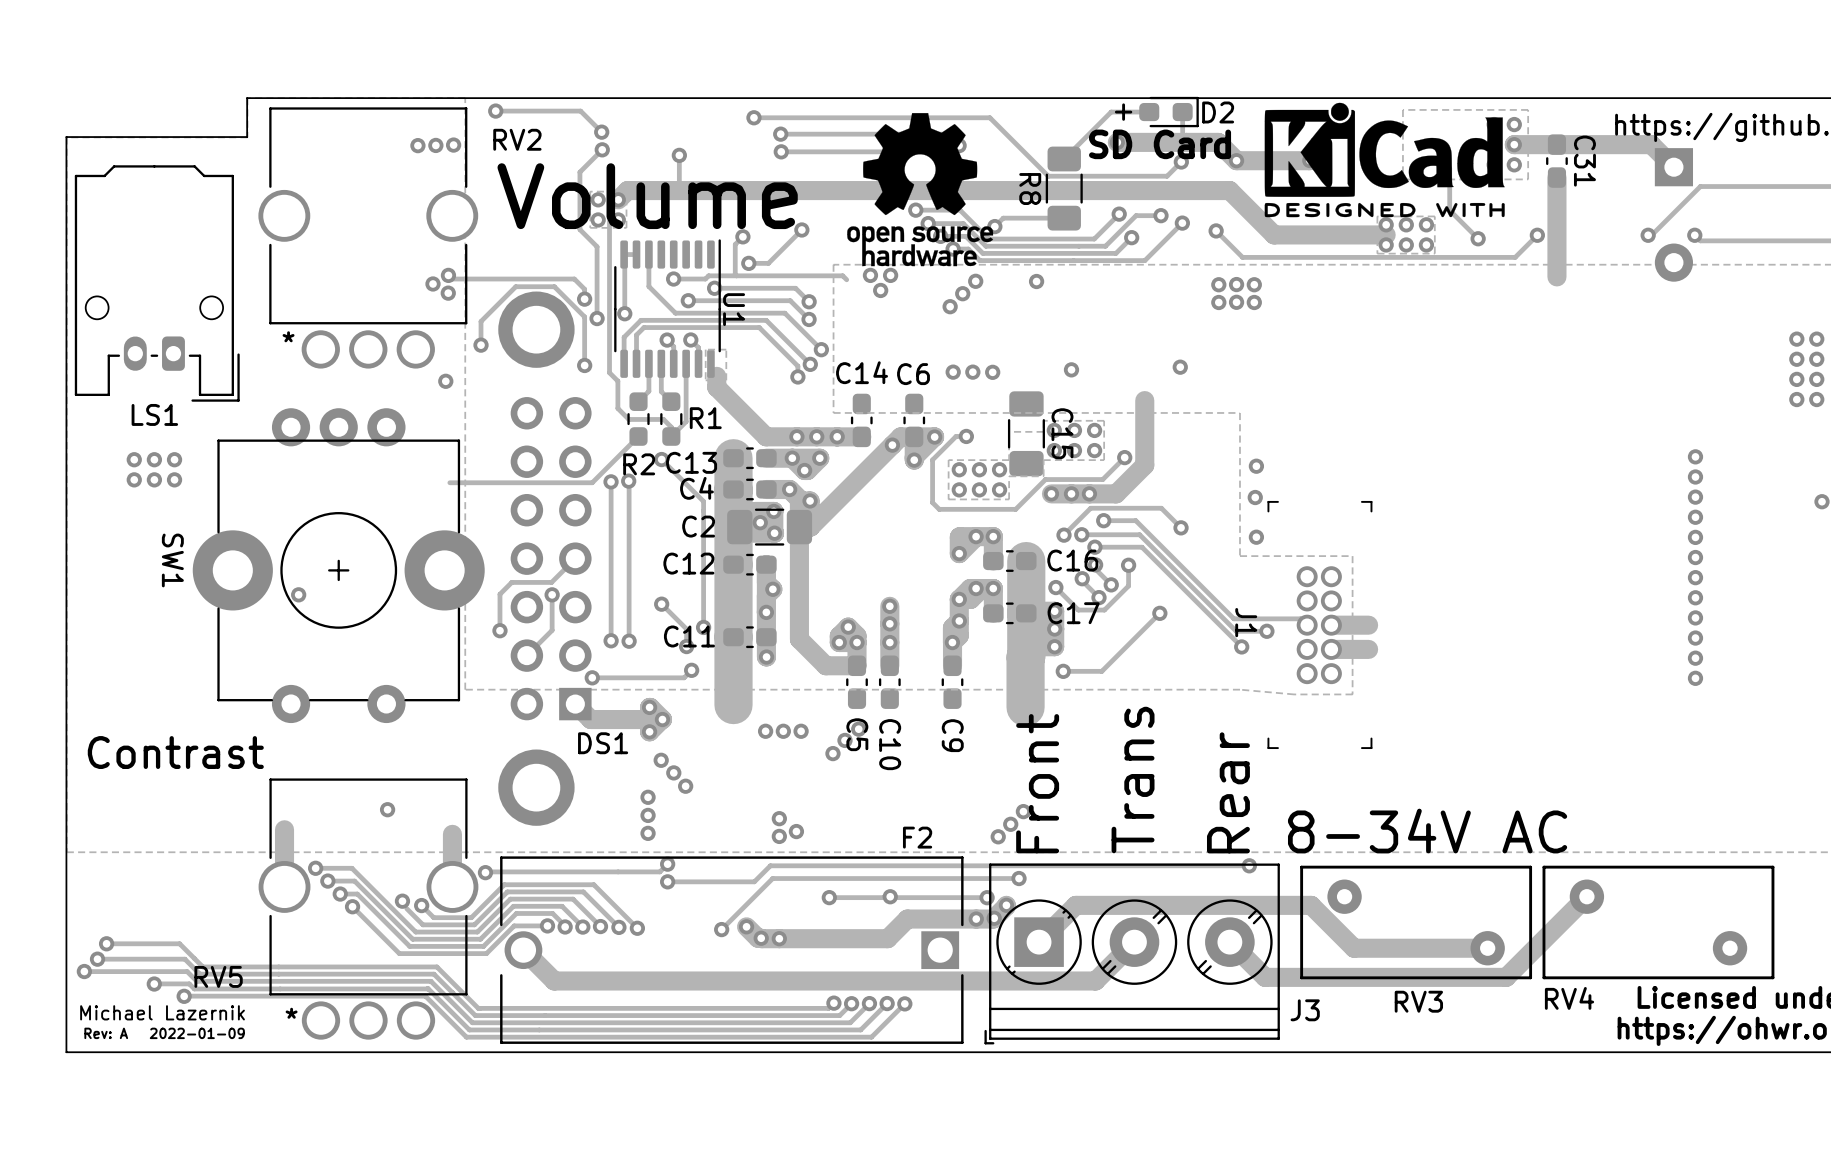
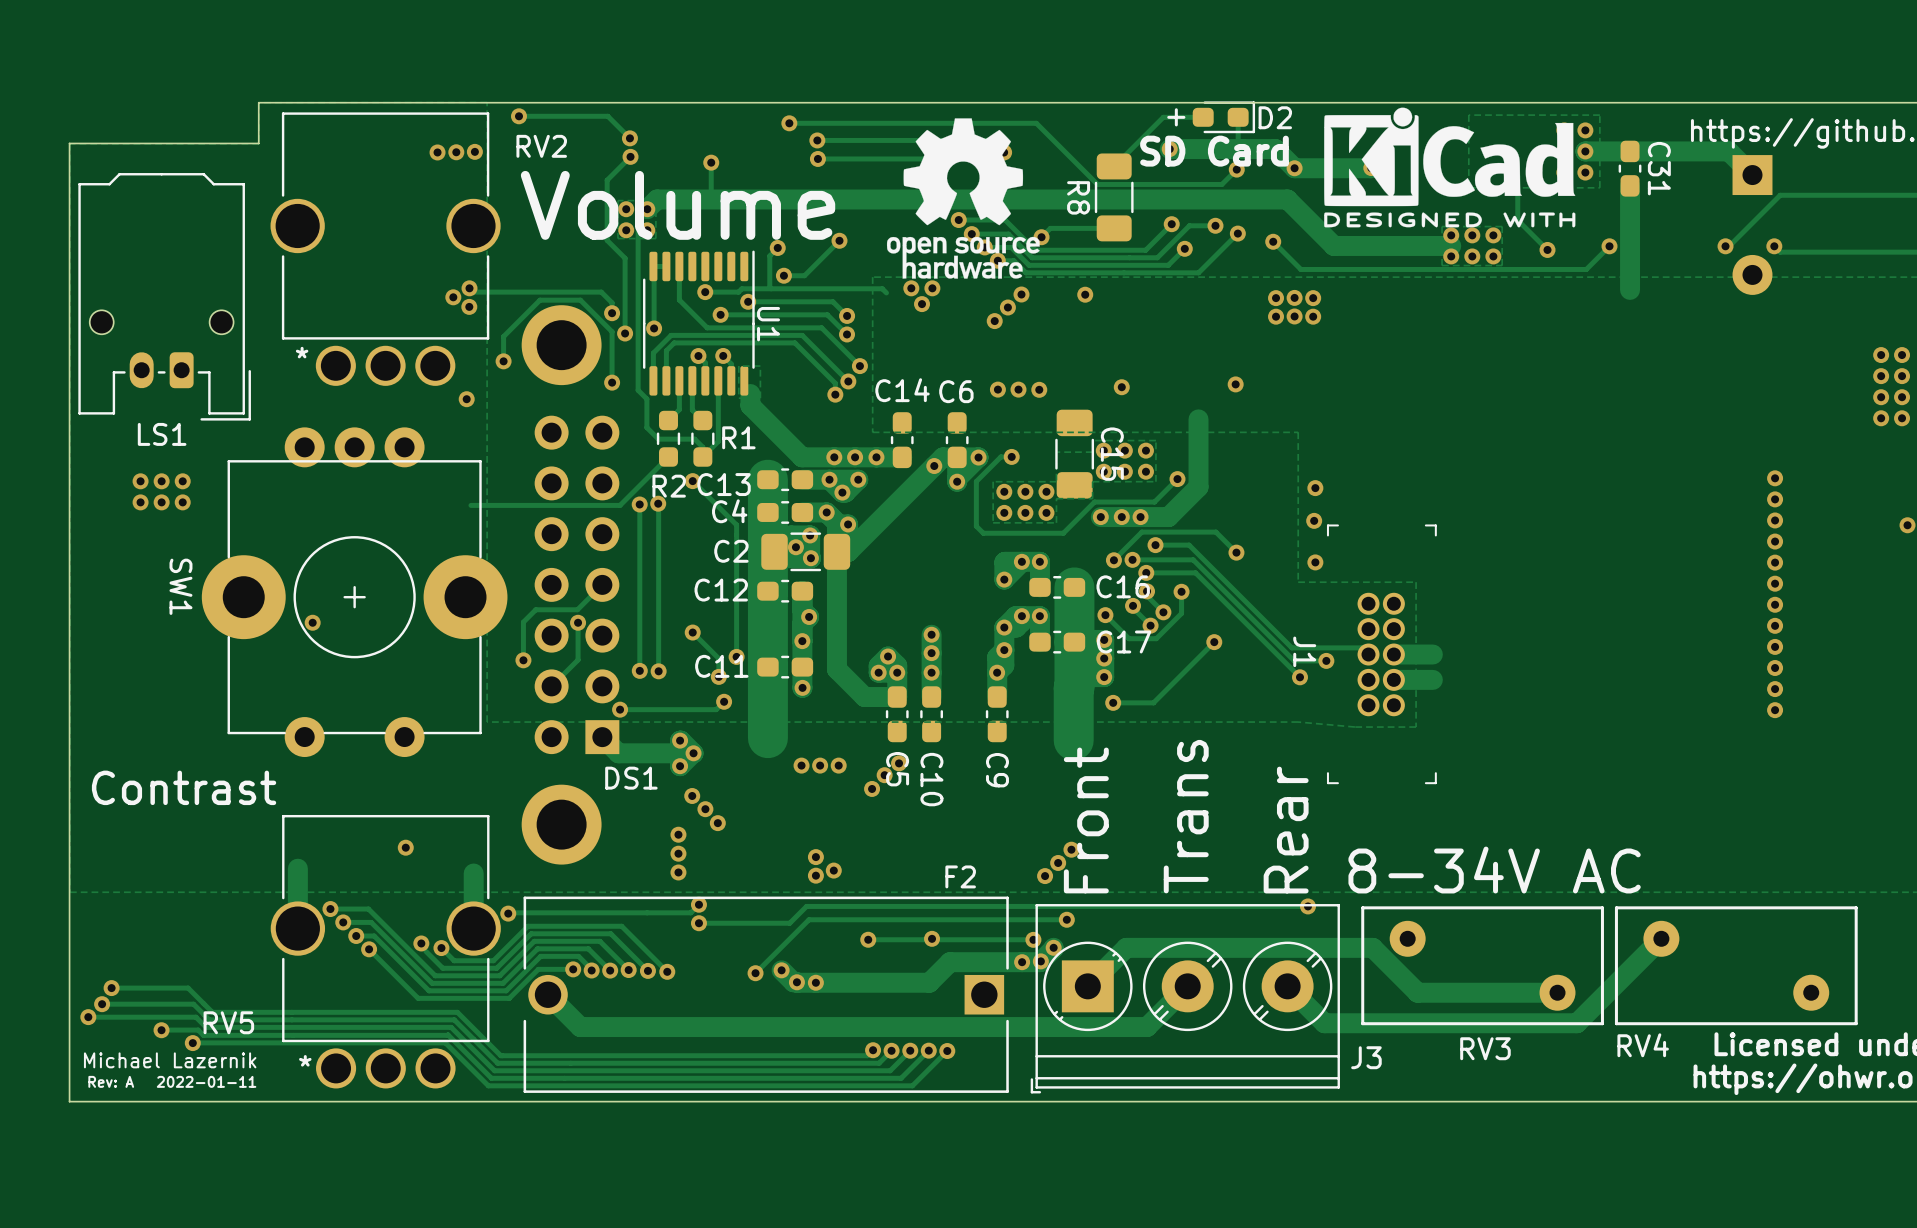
text: 2022-01-09 (197, 1033) -> 2022-01-11 (206, 1081)

